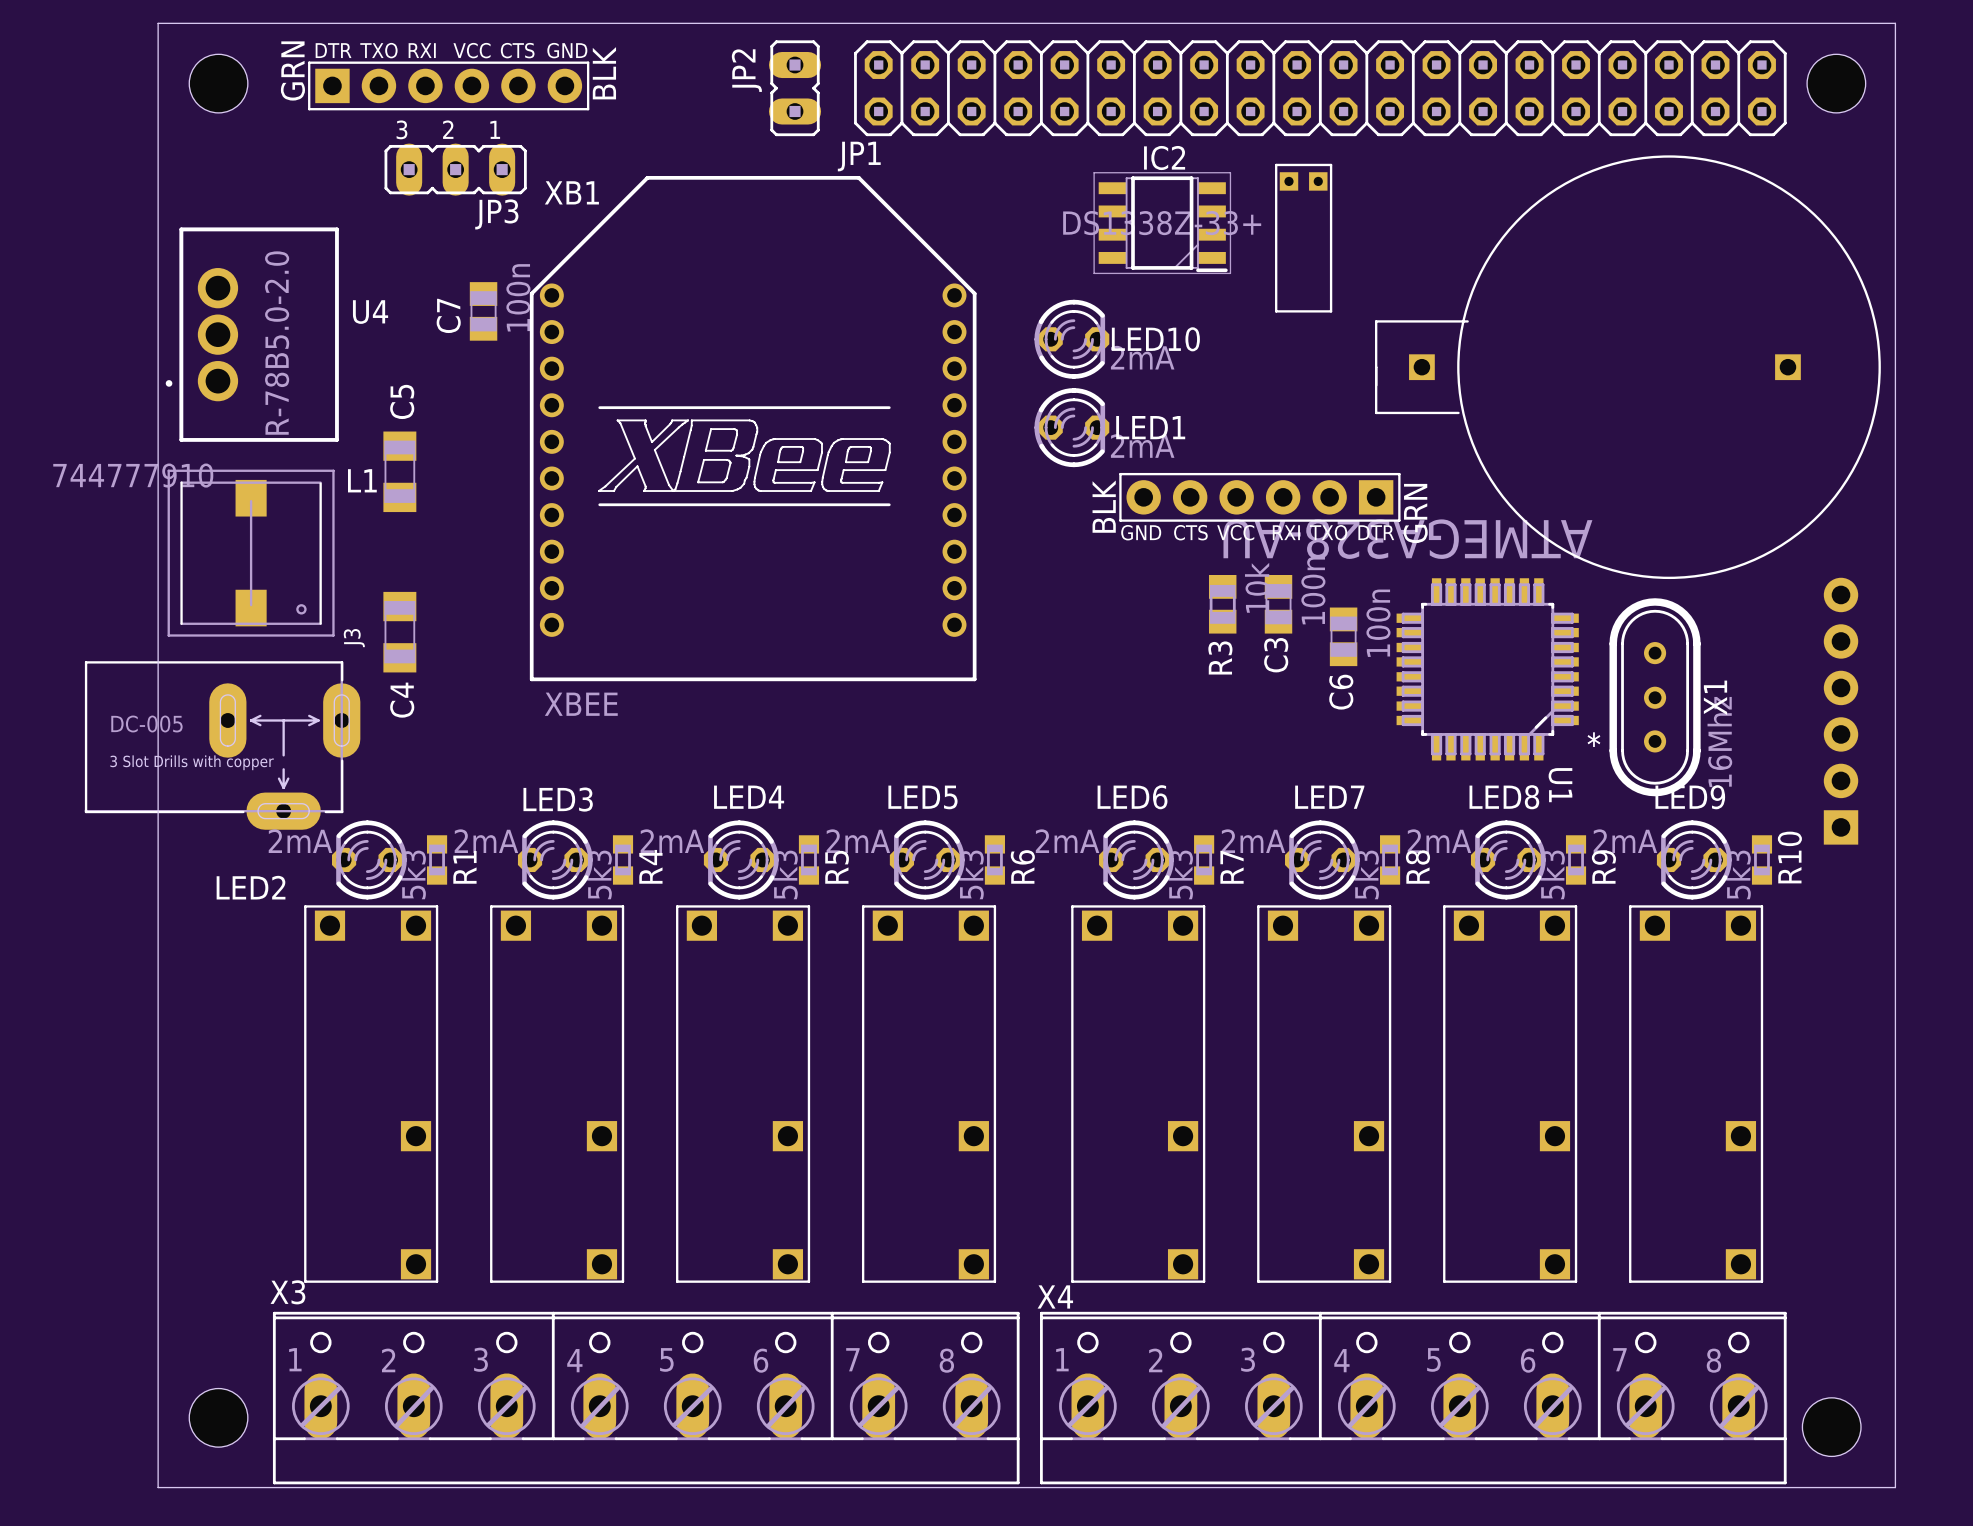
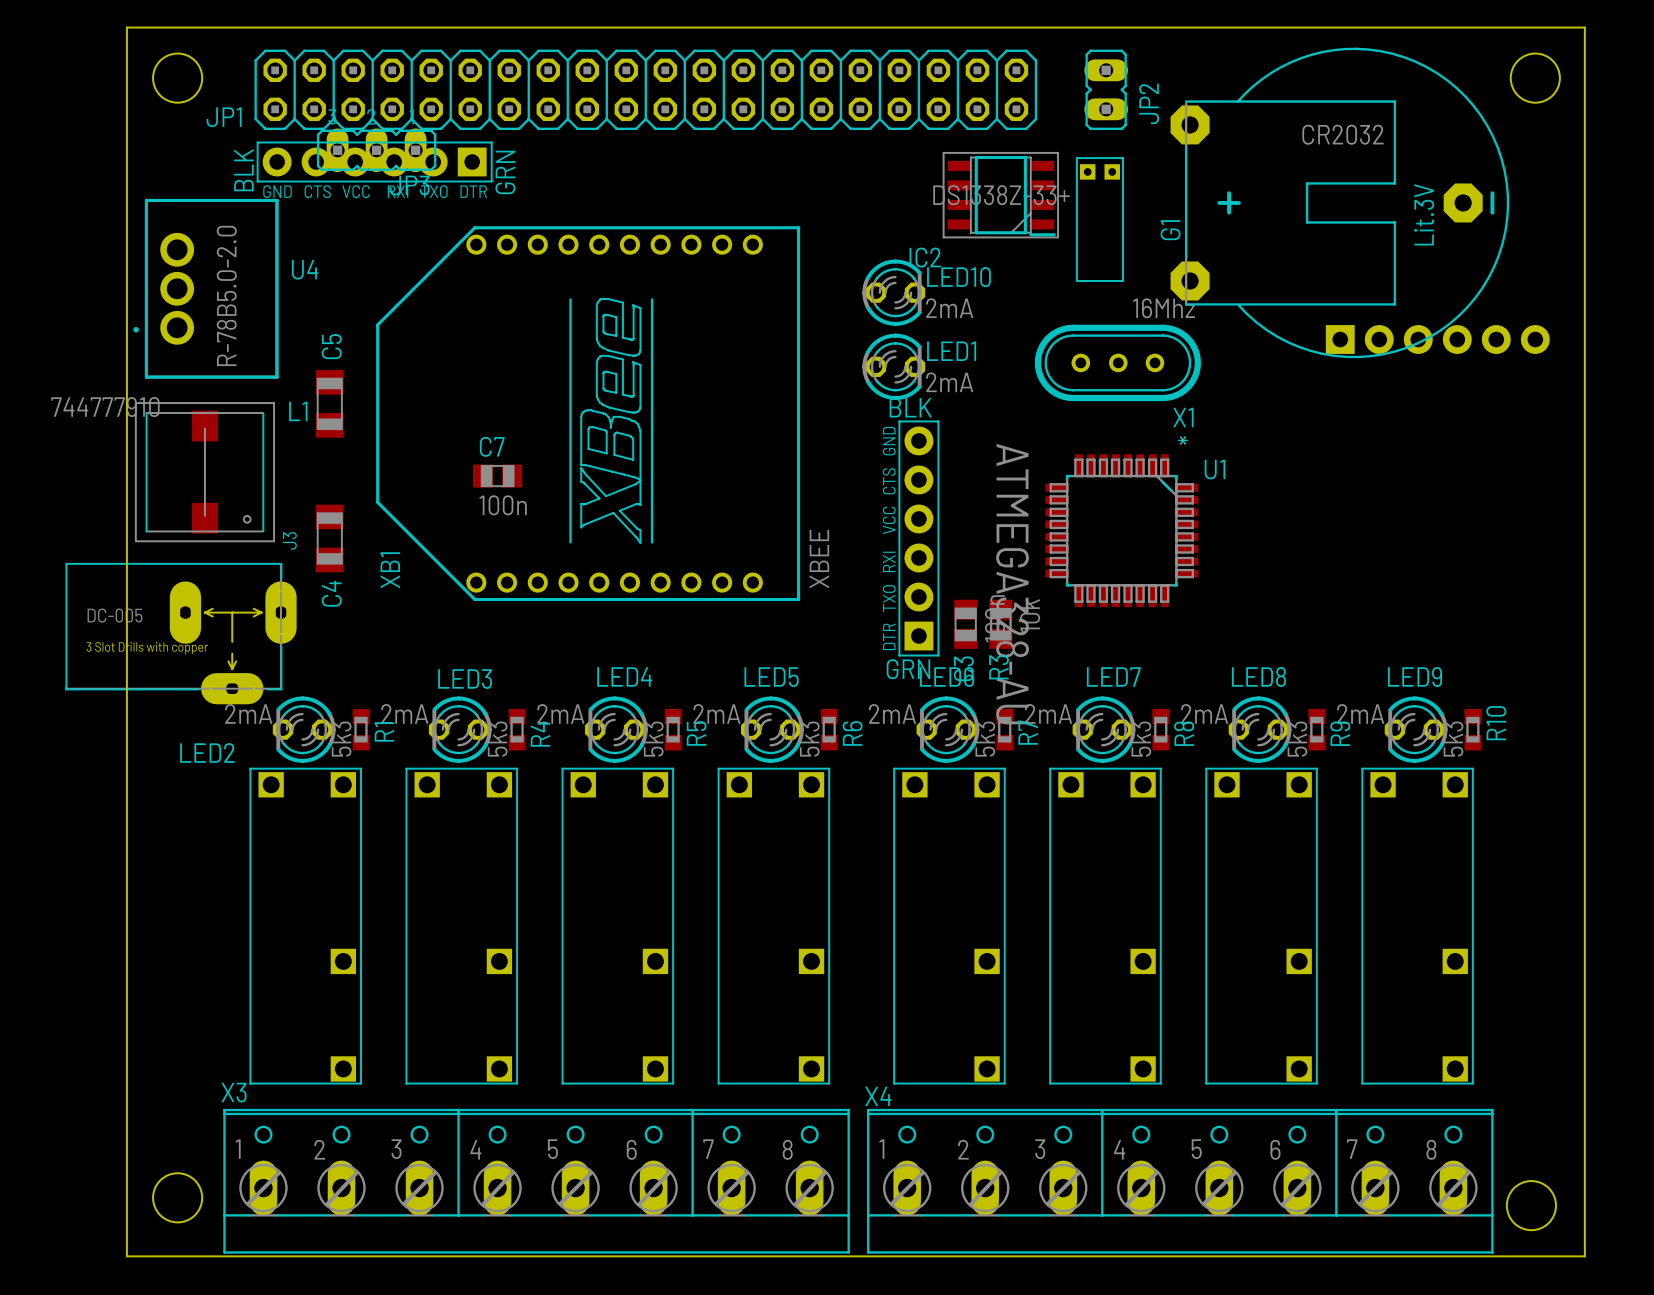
JP2 name position: JP2 (746, 70) -> JP2 (1149, 103)
part: (448, 85) -> none
JP2 position: (795, 88) -> (1106, 89)
JP1 position: (1320, 88) -> (645, 89)
JP1 name position: JP1 (859, 156) -> JP1 (224, 117)
IC2 name position: IC2 (1164, 158) -> IC2 (925, 257)
part: none -> (374, 161)
IC2 position: (1162, 223) -> (1000, 195)
G1: none -> CR2032 (1339, 202)
part position: (1303, 238) -> (1099, 219)
C7 rotation: 0° (483, 311) -> 90° clockwise (497, 476)
C7 position: (483, 311) -> (497, 476)
LED10 name position: LED10 (1155, 339) -> LED10 (958, 277)
part: (1627, 367) -> none
LED1 name position: LED1 (1150, 427) -> LED1 (951, 351)
XB1 rotation: 0° (753, 428) -> 90° counterclockwise (588, 413)
part: (1259, 497) -> none
R3 position: (1222, 604) -> (1000, 624)
C3 position: (1278, 604) -> (965, 624)
part: none -> (918, 538)
C6: 100n (1343, 636) -> none
U1 rotation: 0° (1487, 669) -> 90° counterclockwise (1121, 530)
U1 position: (1487, 669) -> (1121, 530)
X1 rotation: 0° (1655, 697) -> 90° counterclockwise (1117, 362)
X1 position: (1655, 697) -> (1117, 362)
X1 name position: X1 (1715, 697) -> X1 (1183, 417)
part rotation: 0° (1841, 711) -> 90° clockwise (1437, 339)
part position: (1841, 711) -> (1437, 339)

